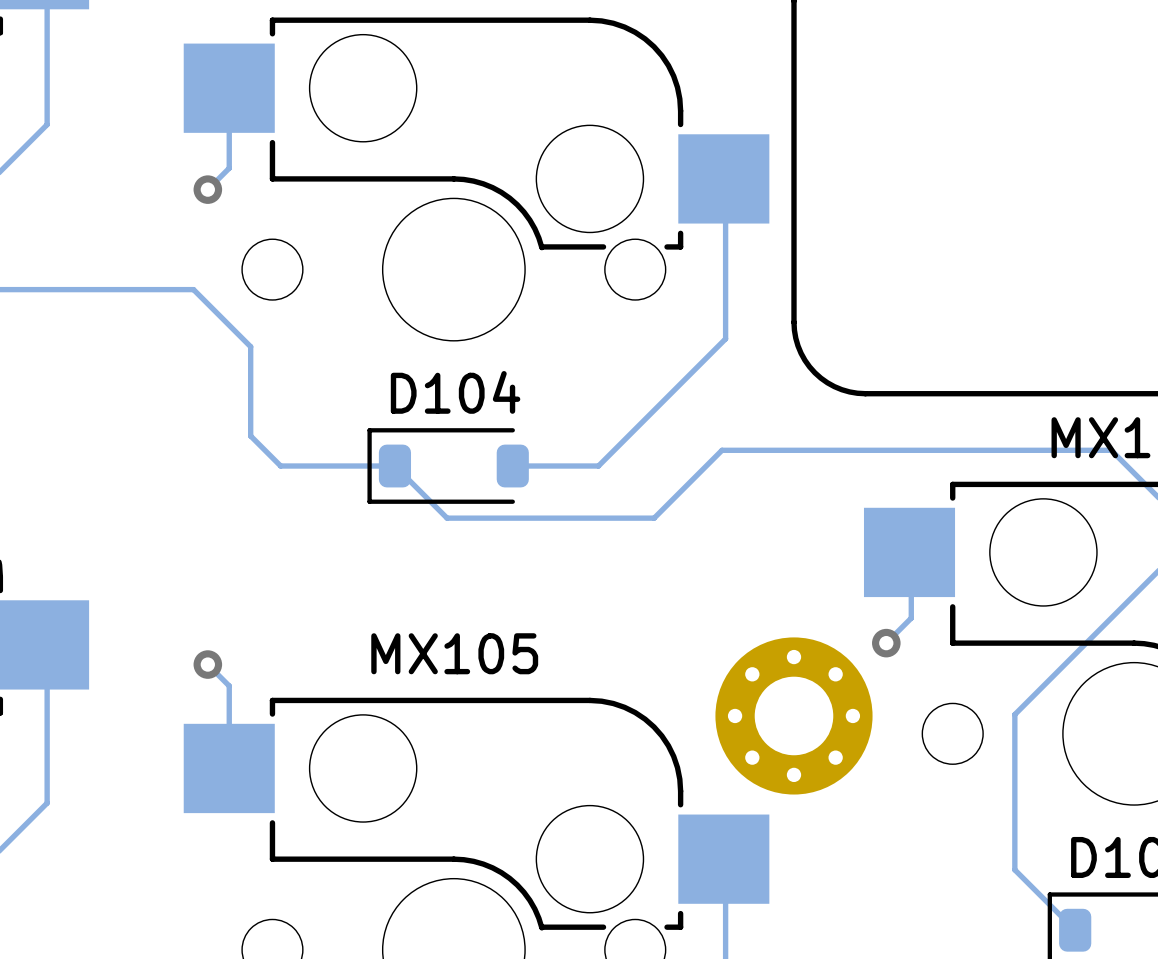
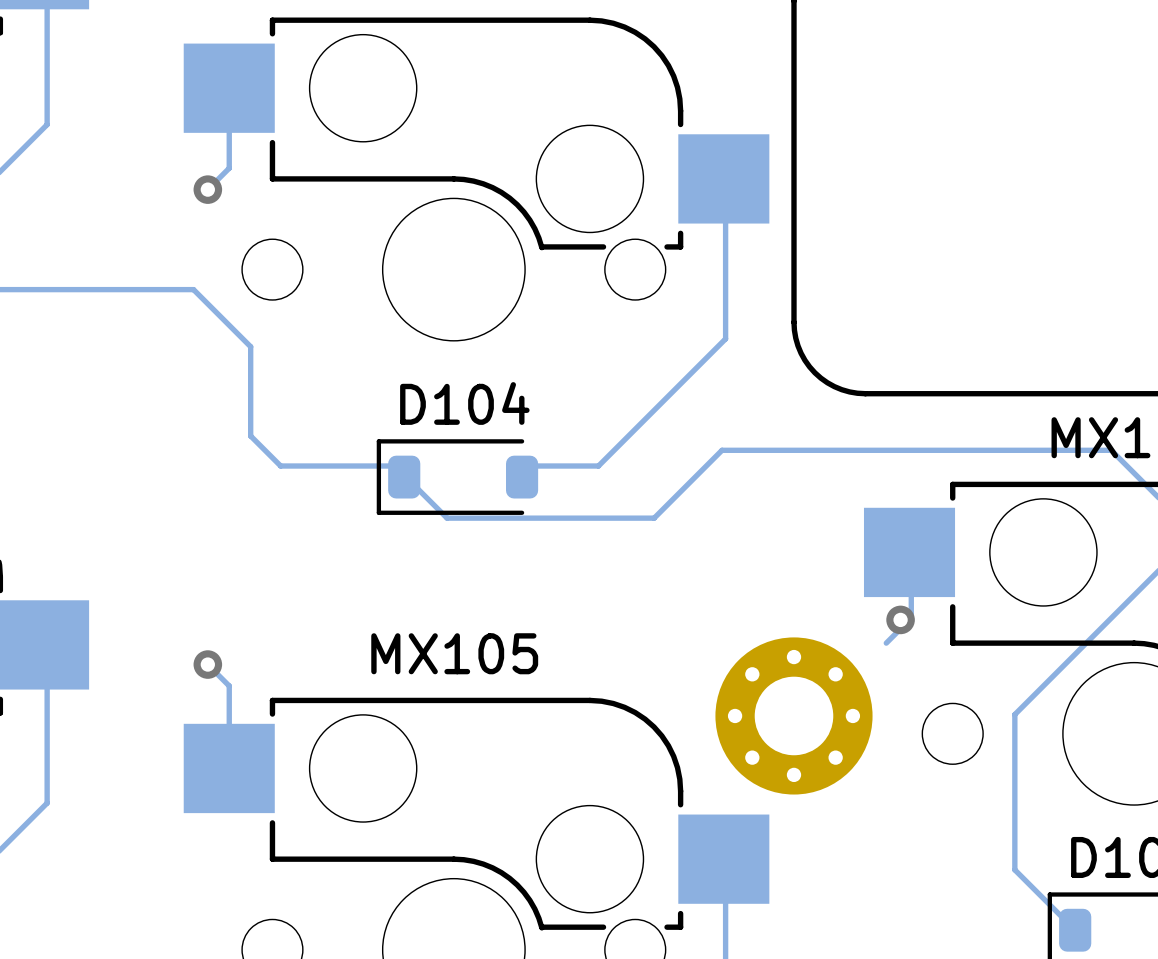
D104 position: (448, 466) -> (457, 477)
via position: (886, 643) -> (900, 619)

